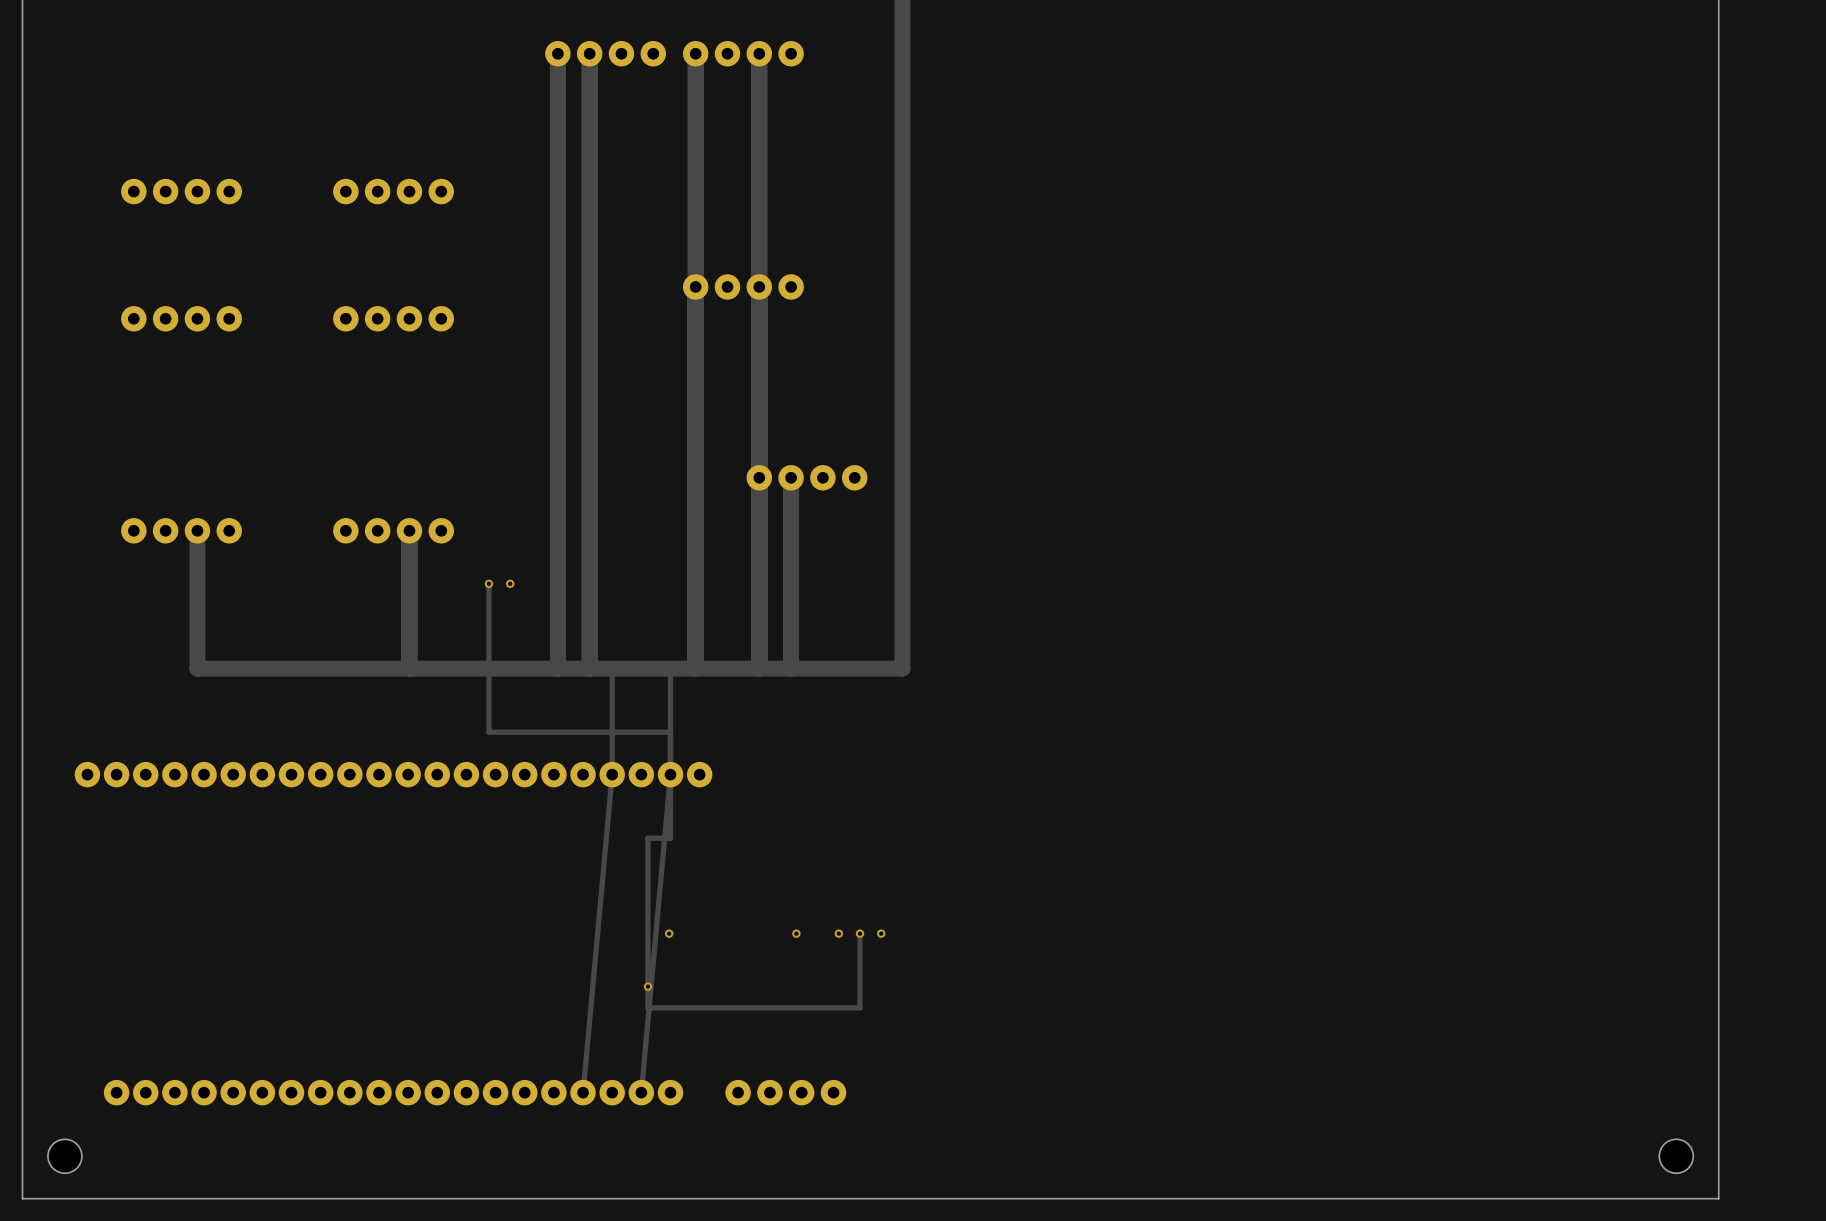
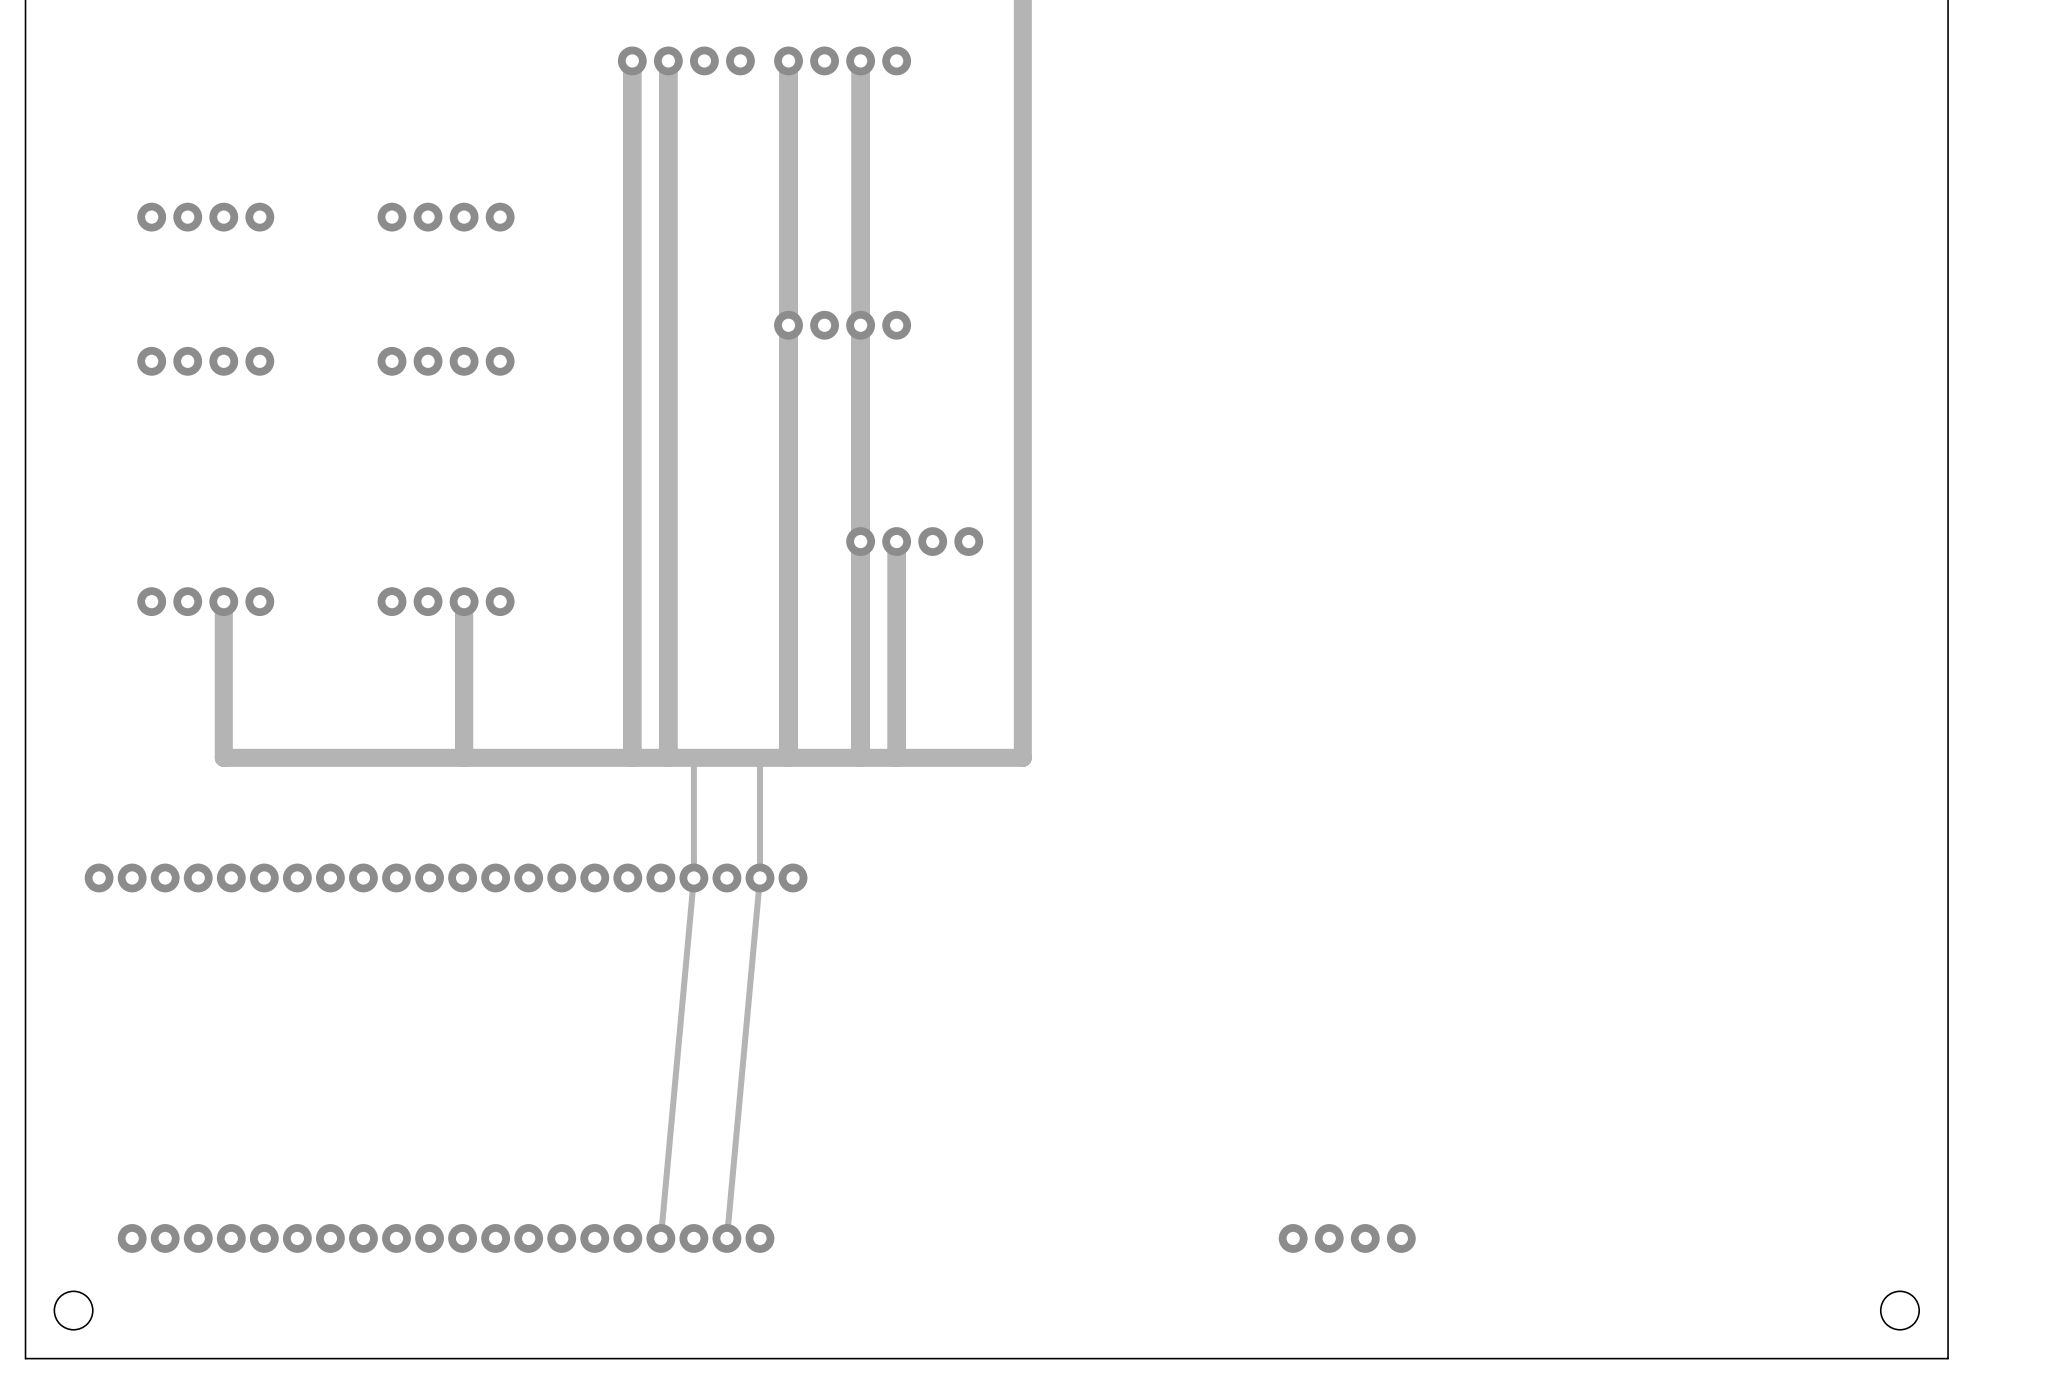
track: (488, 583) (488, 732) (670, 732) -> none
via: (488, 583) -> none
via: (510, 583) -> none
track: (670, 774) (670, 838) (647, 838) (647, 1007) (860, 1007) (860, 933) -> none
via: (669, 933) -> none
via: (796, 933) -> none
via: (838, 933) -> none
via: (860, 933) -> none
via: (881, 933) -> none
via: (647, 986) -> none
part: (785, 1092) -> none
part: none -> (1347, 1238)

